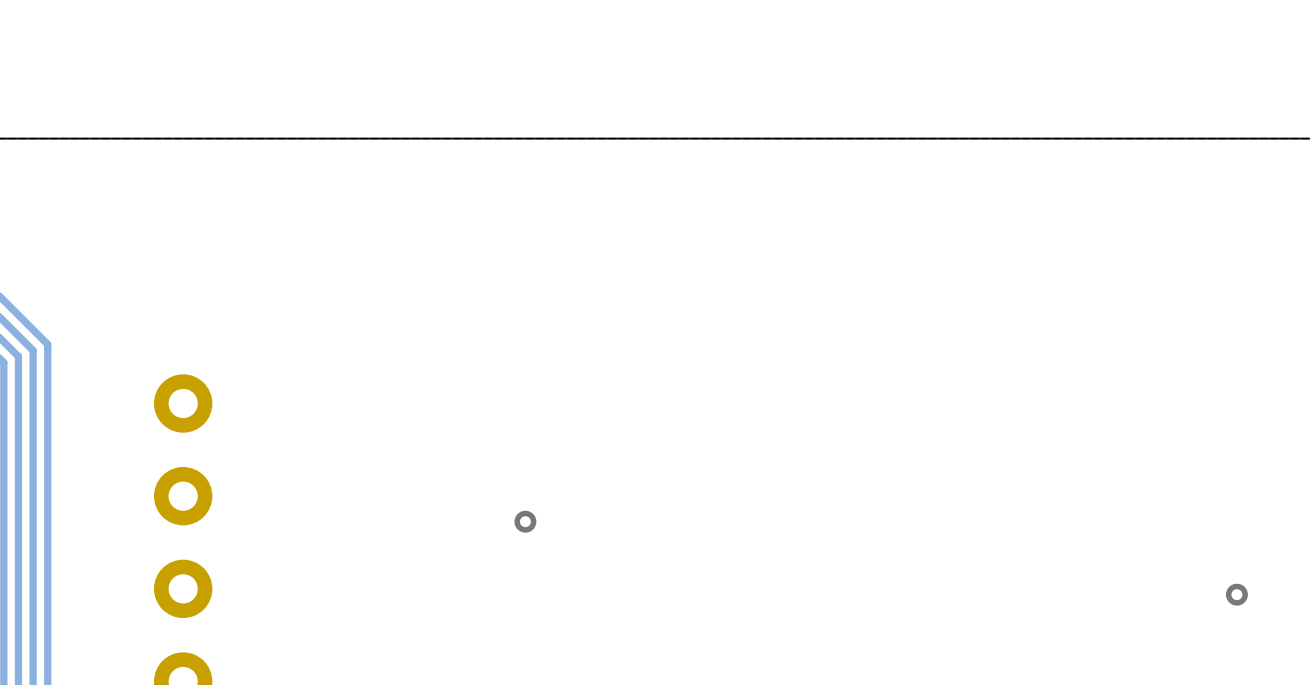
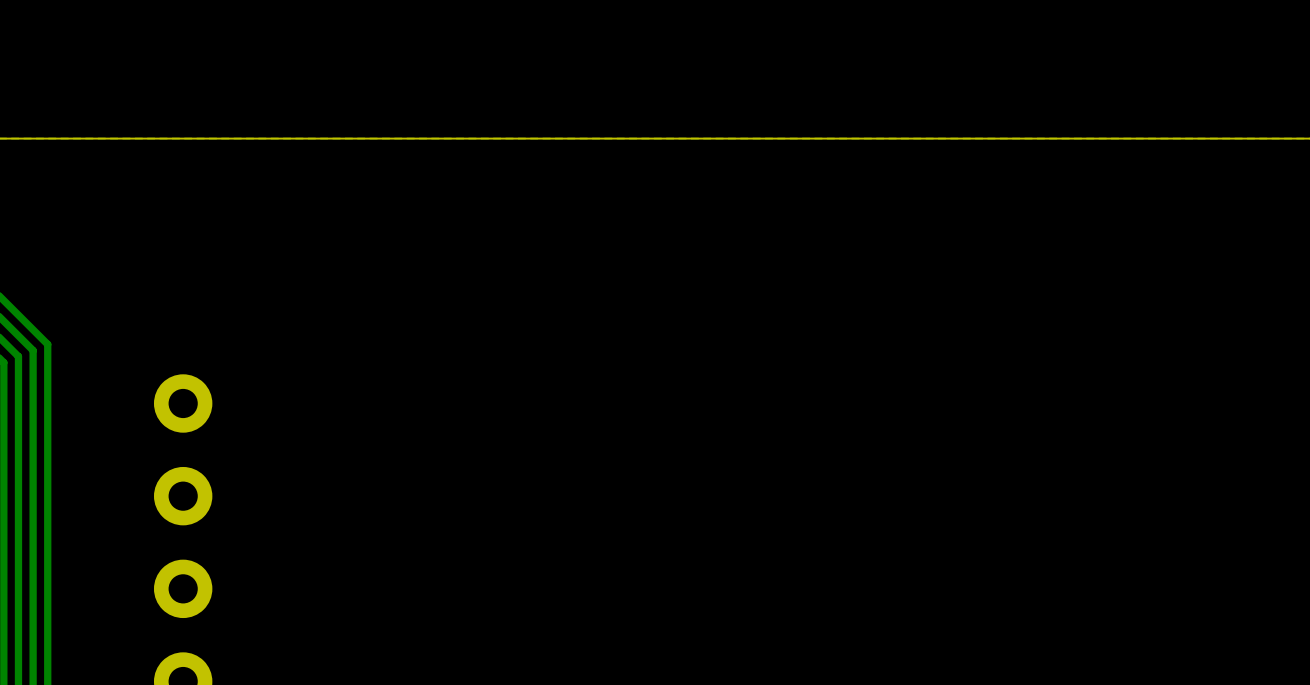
via: (525, 521) -> none
via: (1236, 594) -> none

